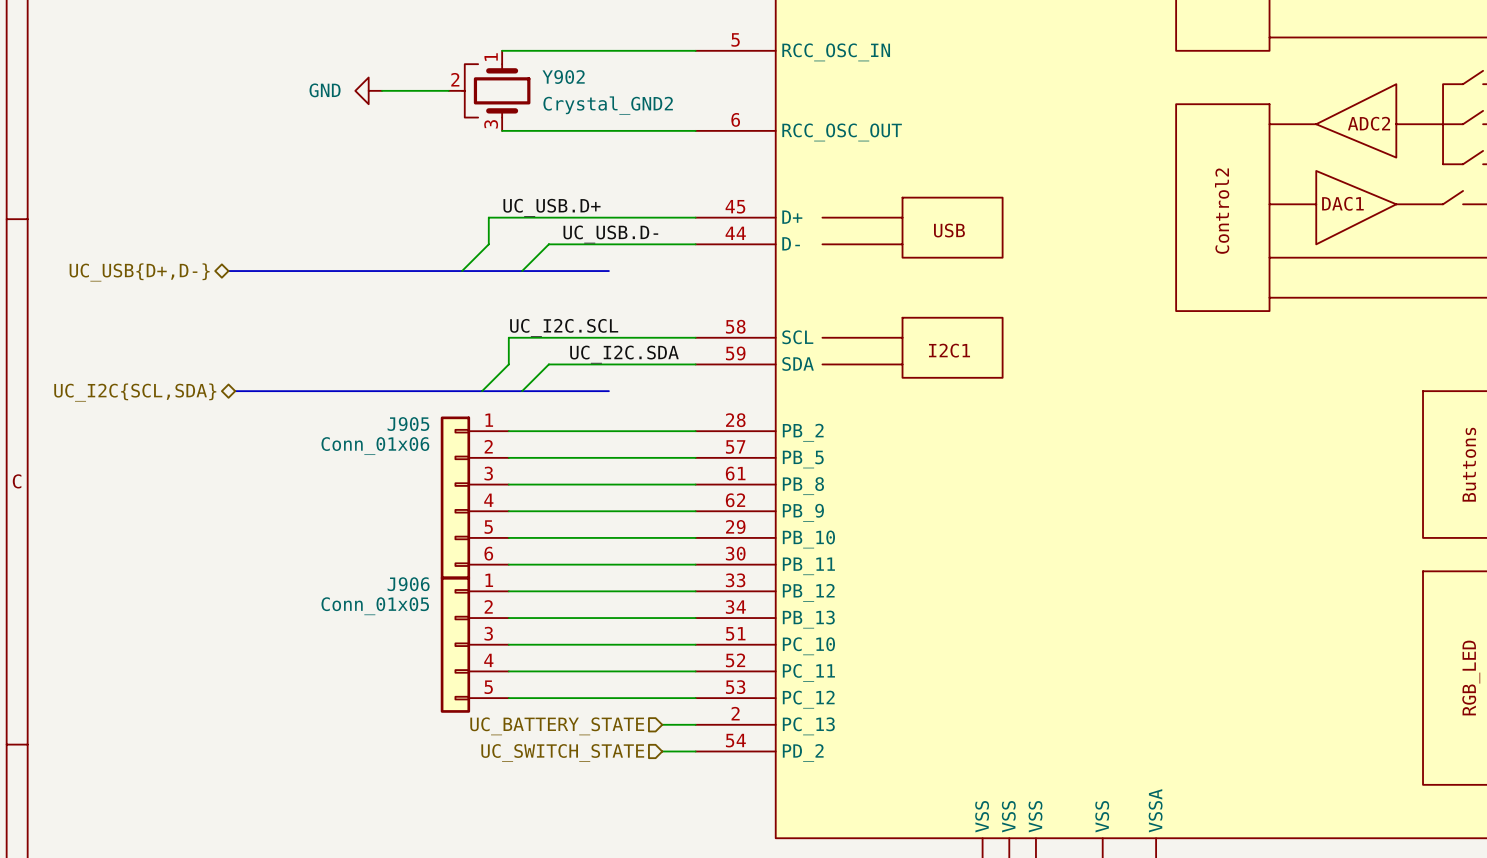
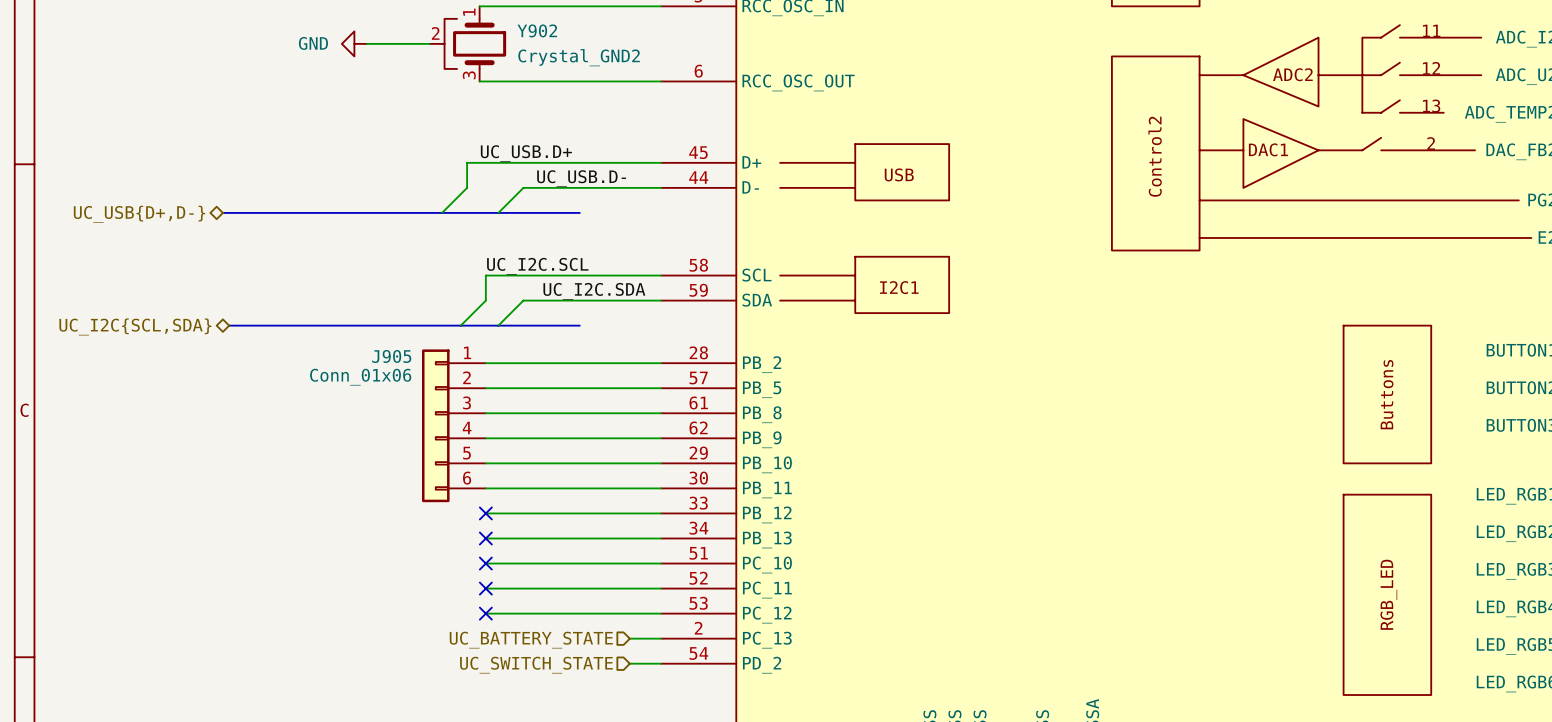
no-connect mark: none -> (485, 513)
no-connect mark: none -> (485, 538)
J906: Conn_01x05 (474, 644) -> none
no-connect mark: none -> (485, 563)
no-connect mark: none -> (485, 588)
no-connect mark: none -> (485, 613)

